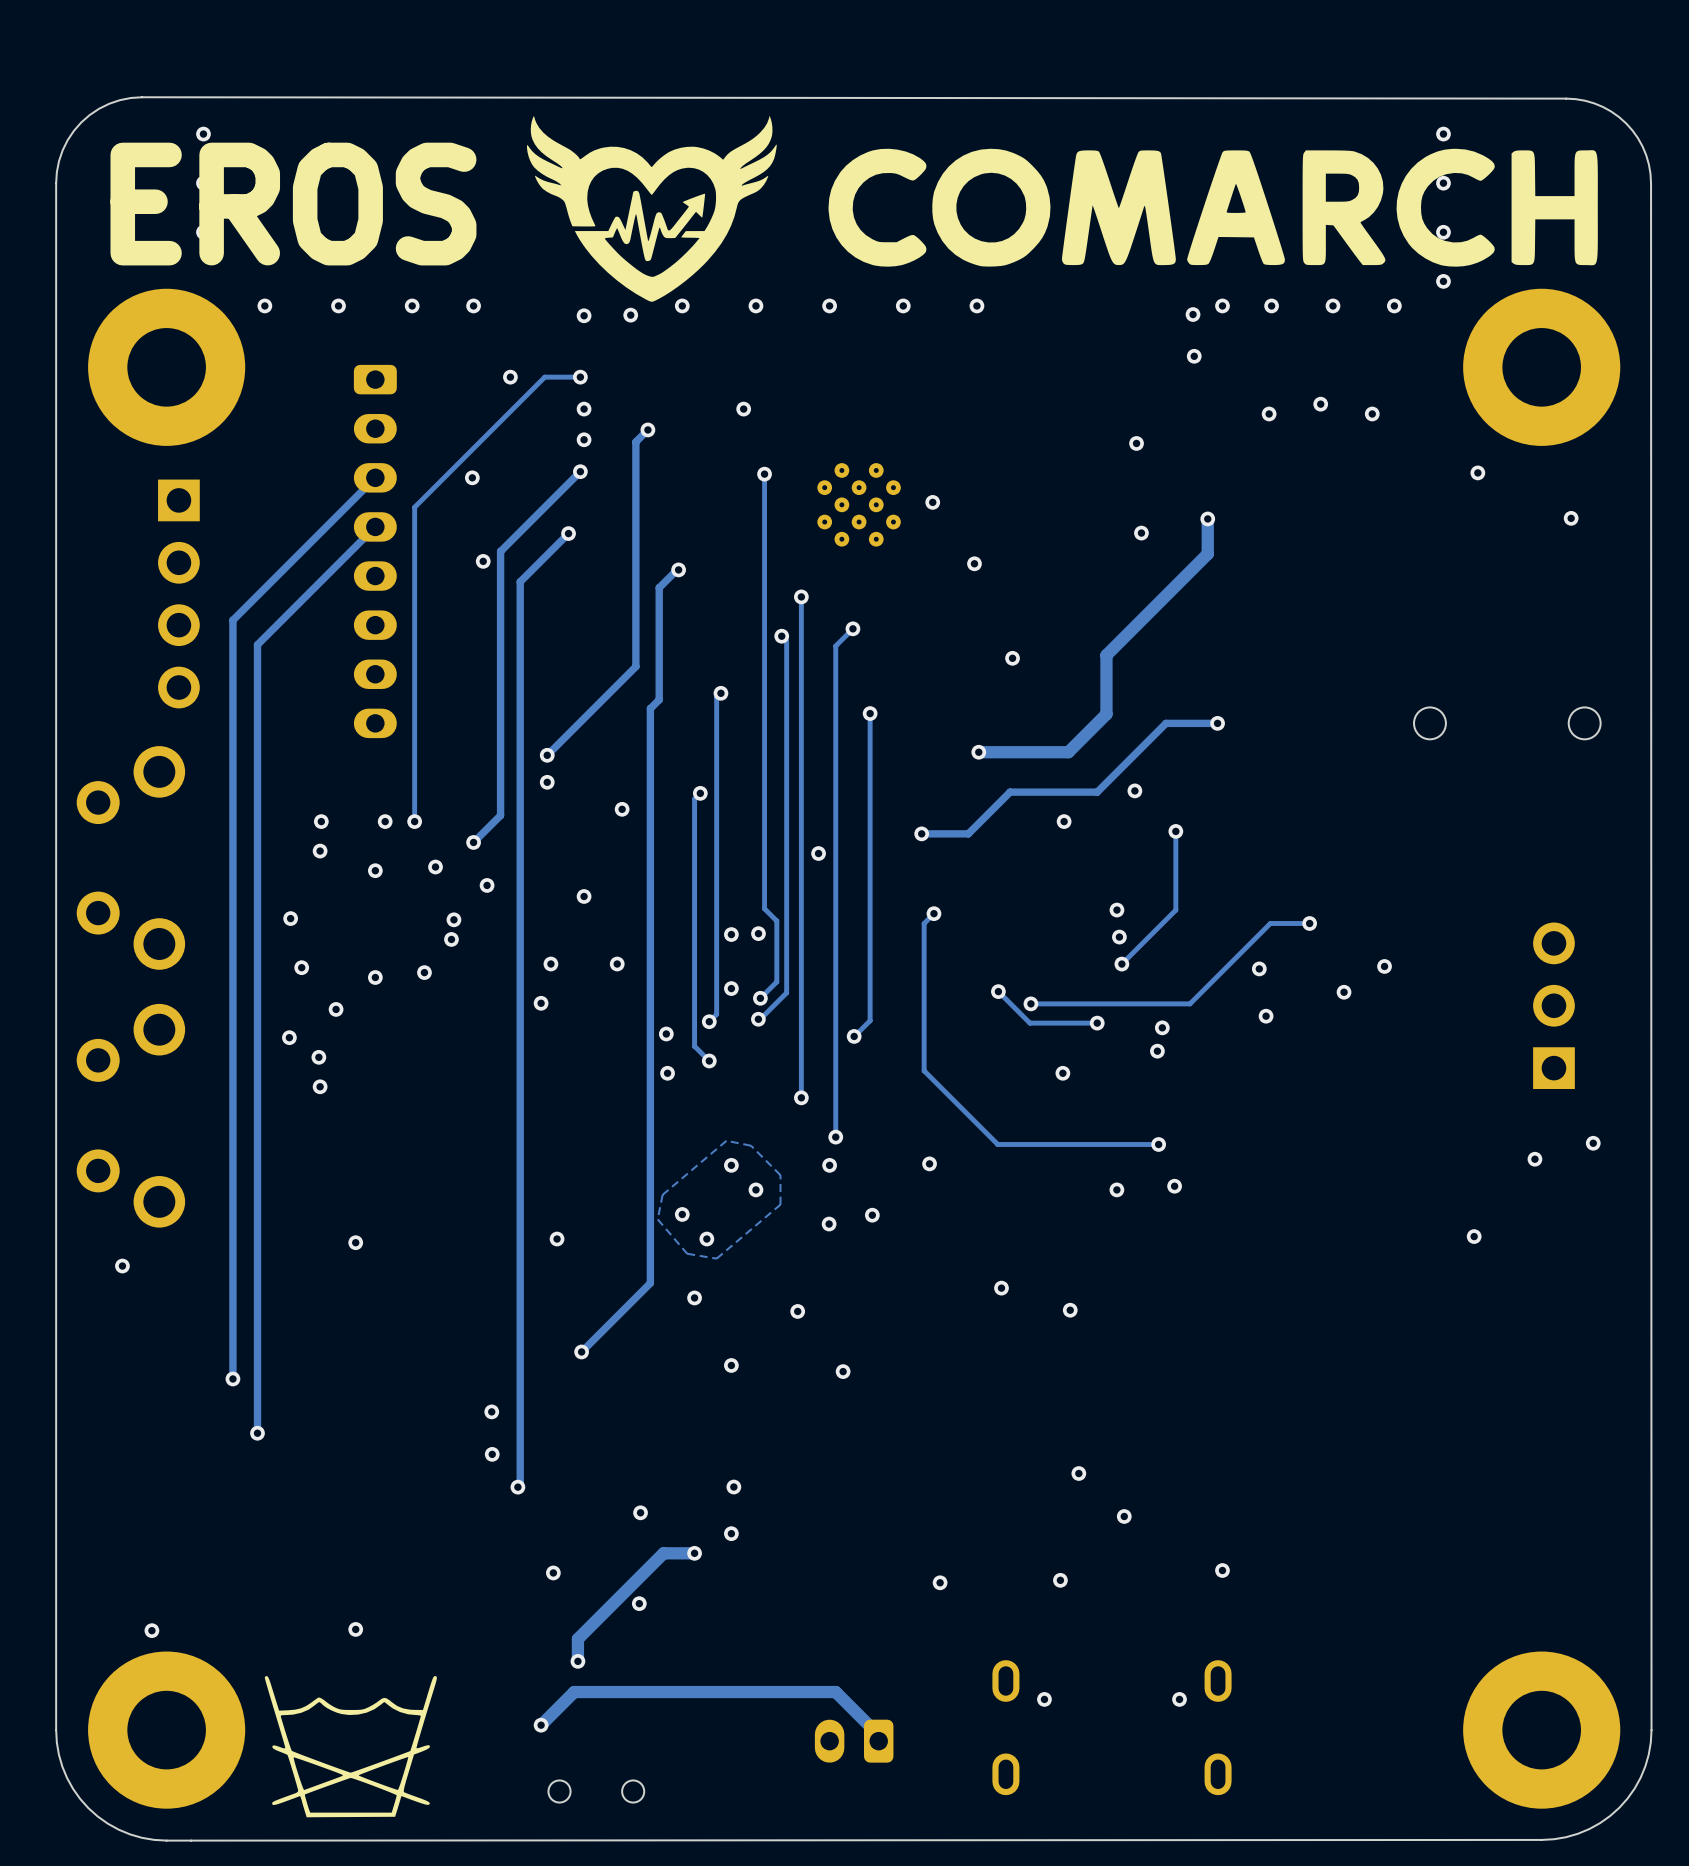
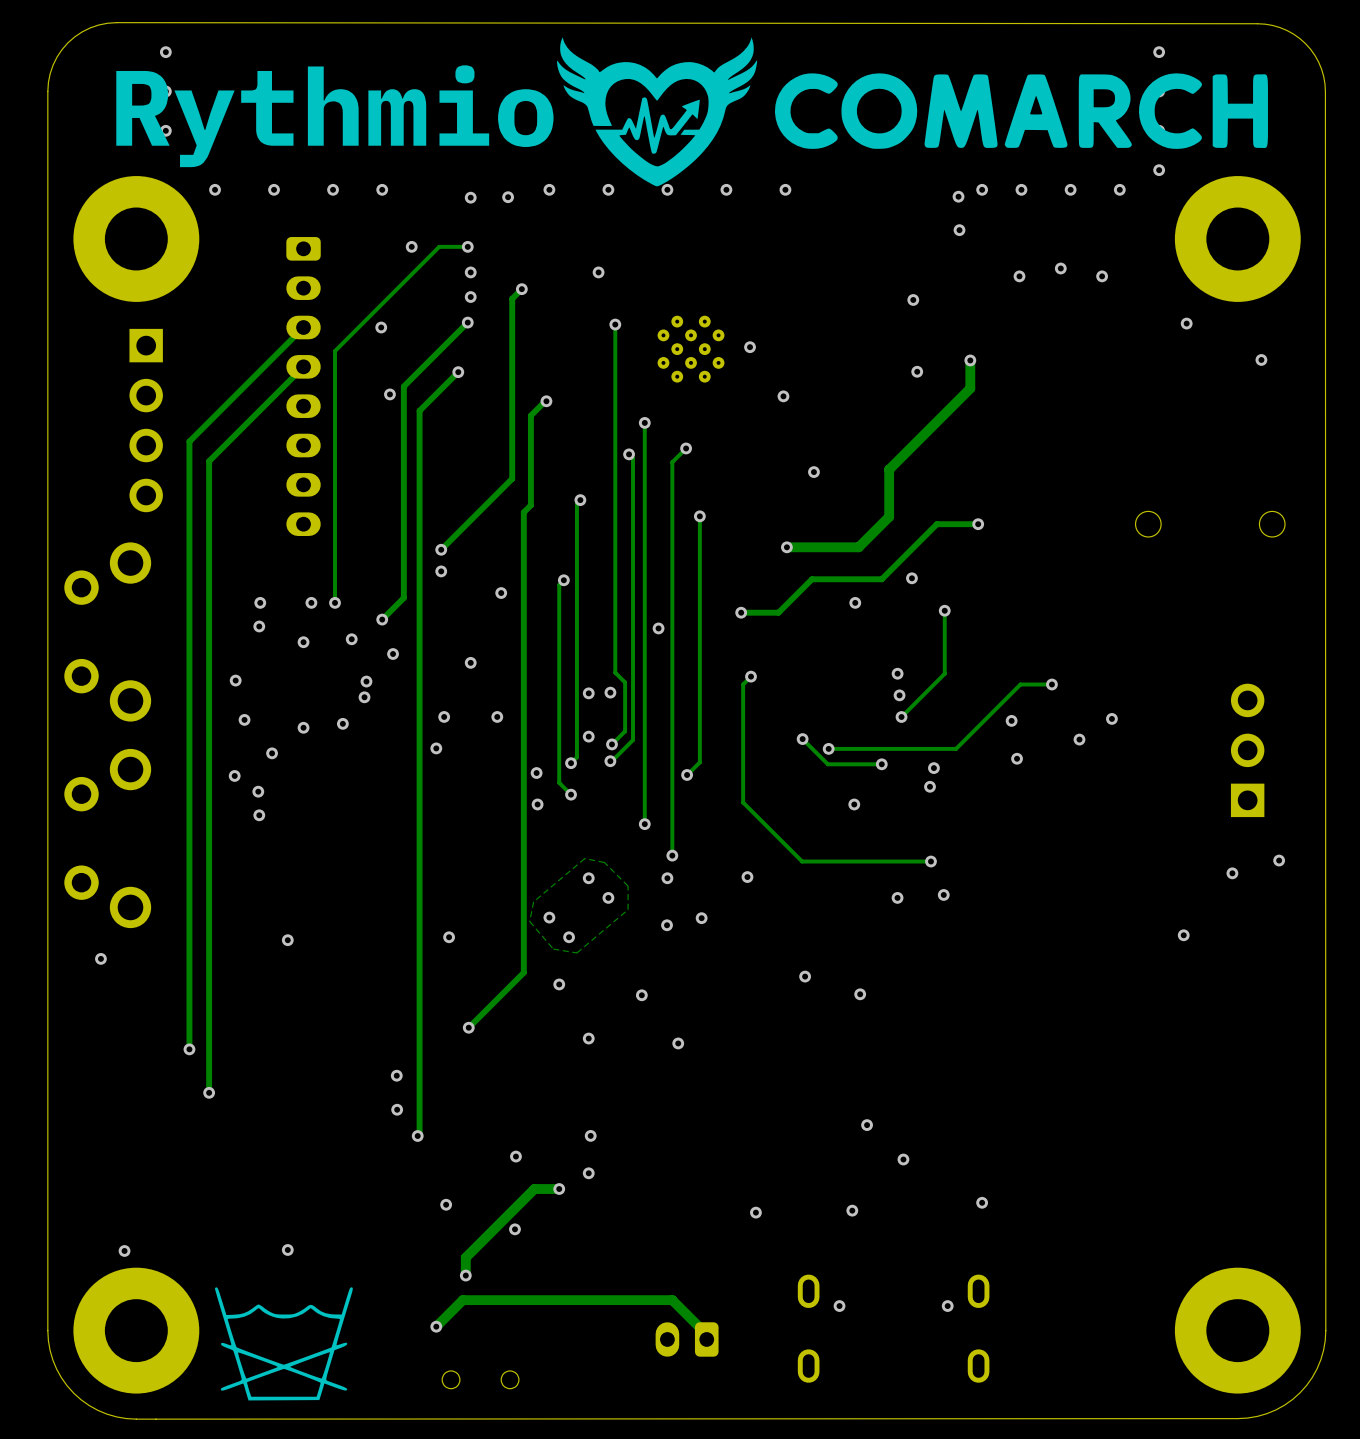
drawing: [828, 148, 1598, 267] -> none
drawing: none -> [774, 73, 1268, 149]
text: EROS (293, 204) -> none
drawing position: (651, 208) -> (657, 111)
text: none -> Rythmio (334, 116)

